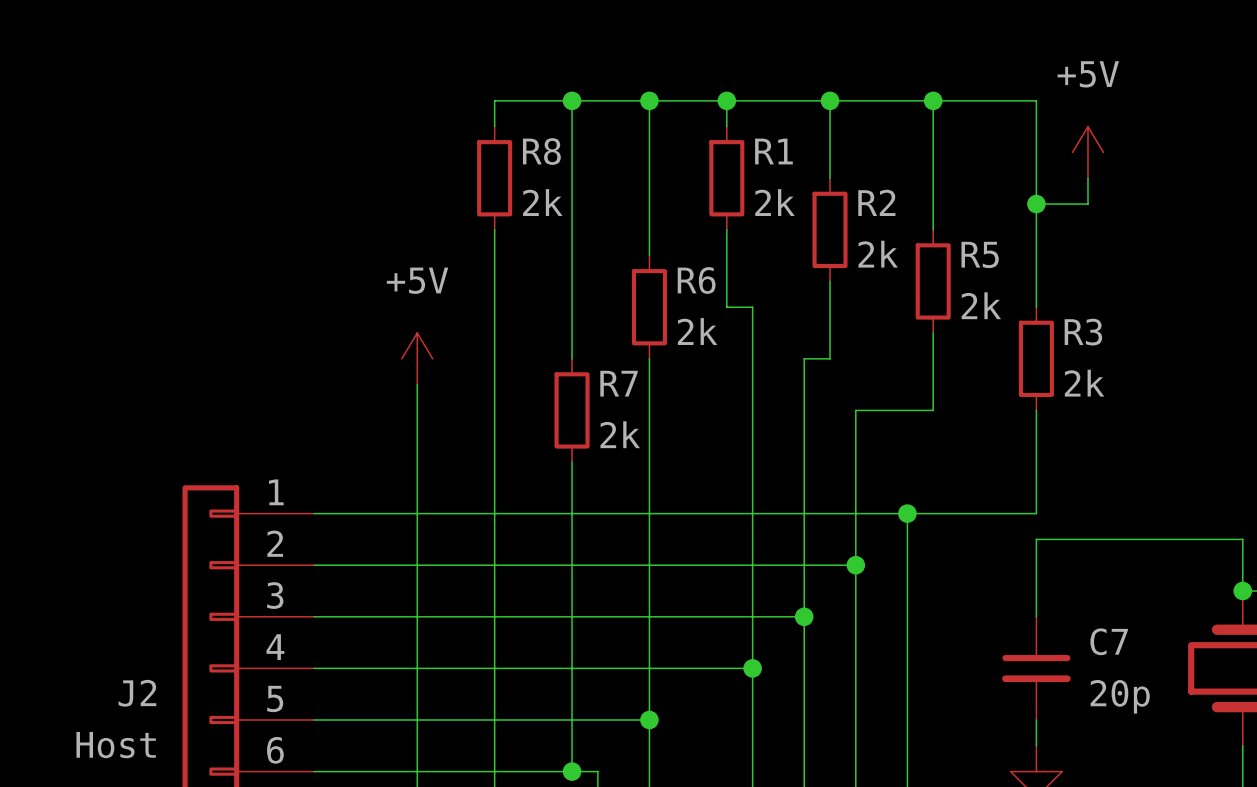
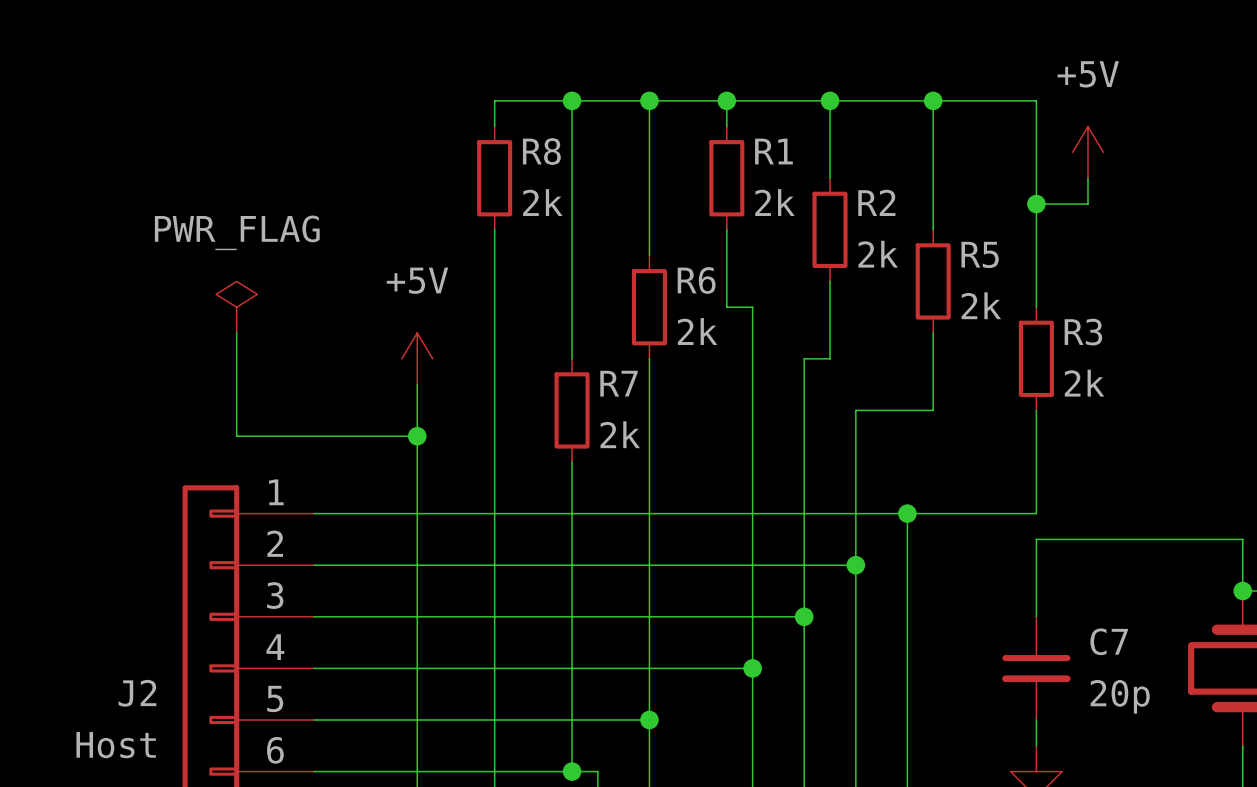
power symbol: none -> PWR_FLAG (236, 307)
wire: none -> (236, 333) (236, 436) (417, 436)
junction: none -> (417, 436)

